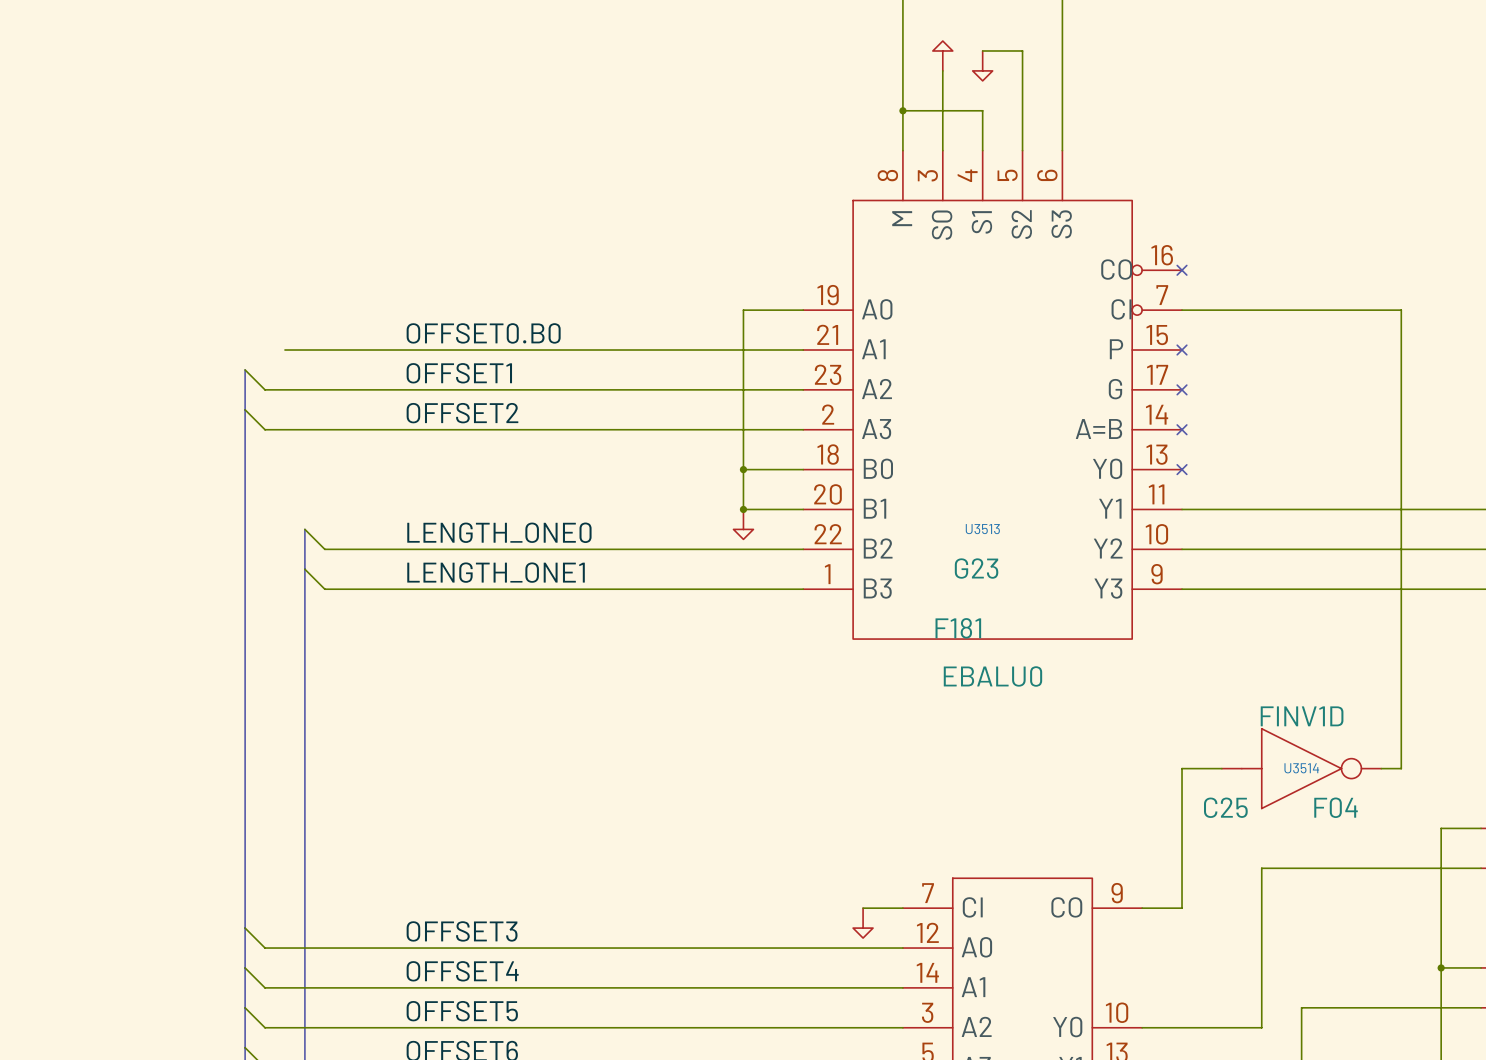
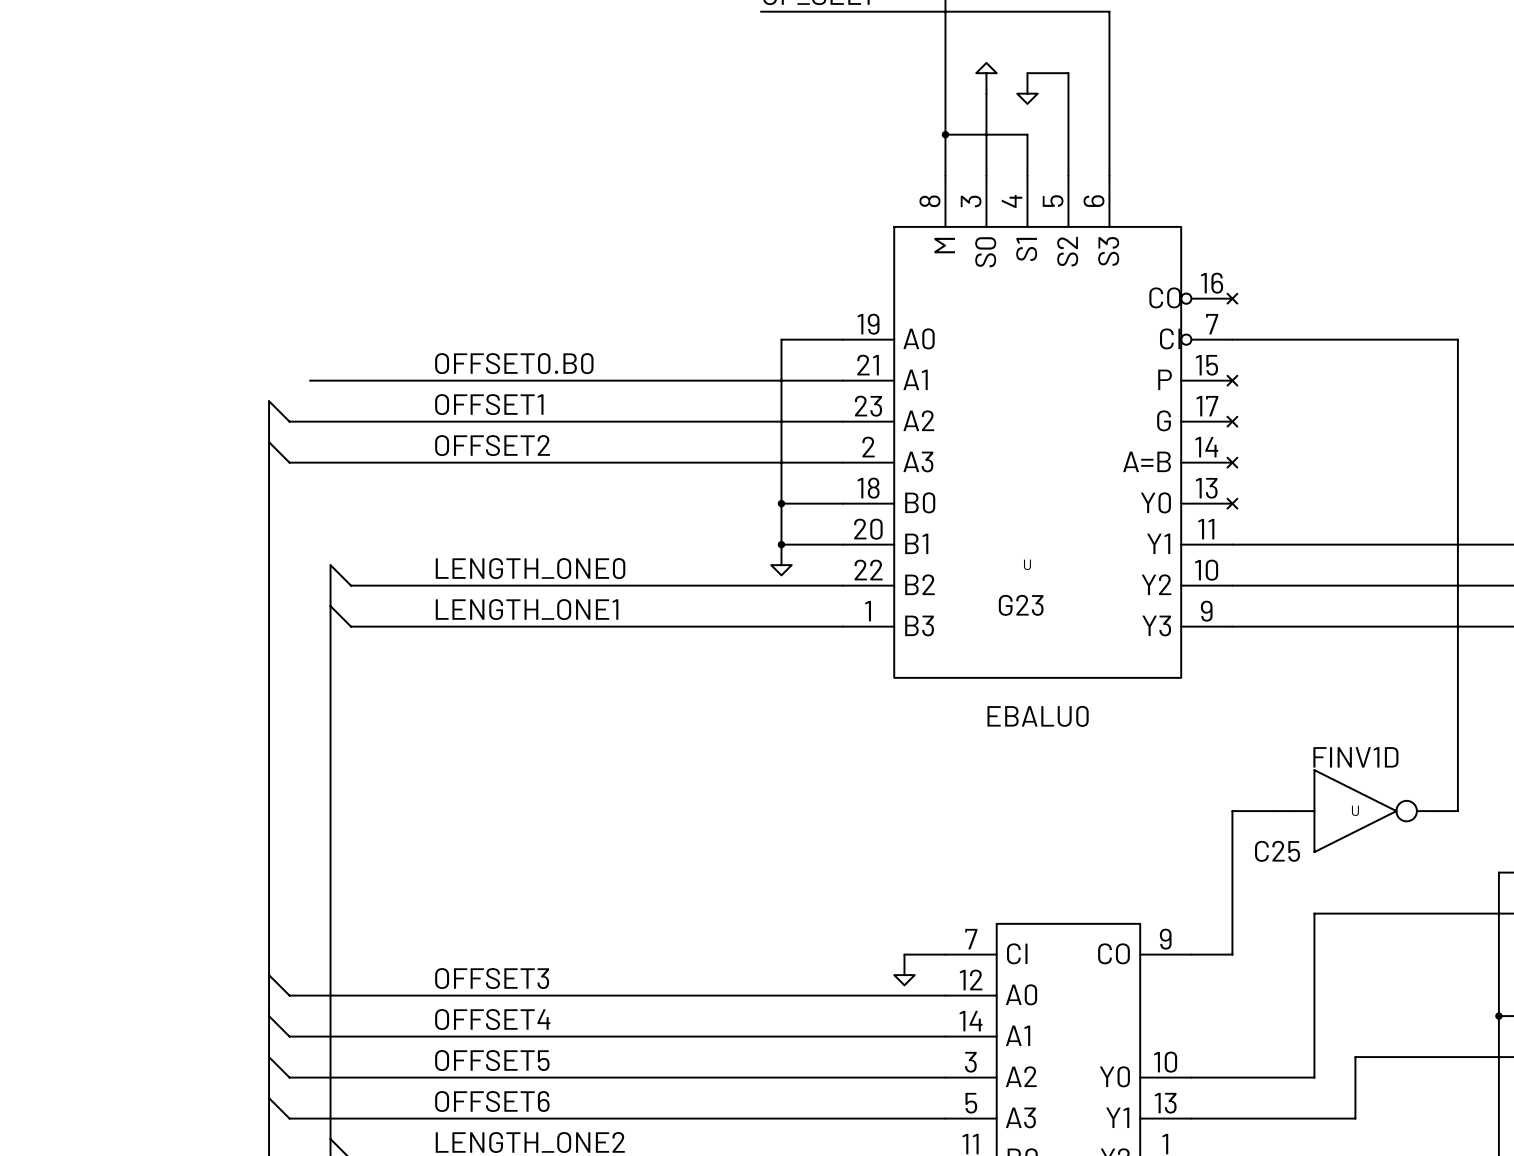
U3513 name: U3513 (982, 529) -> U (1027, 564)
U3513 value: F181 (958, 628) -> none
U3514 name: U3514 (1301, 768) -> U (1355, 810)
U3514 value: F04 (1336, 807) -> none

